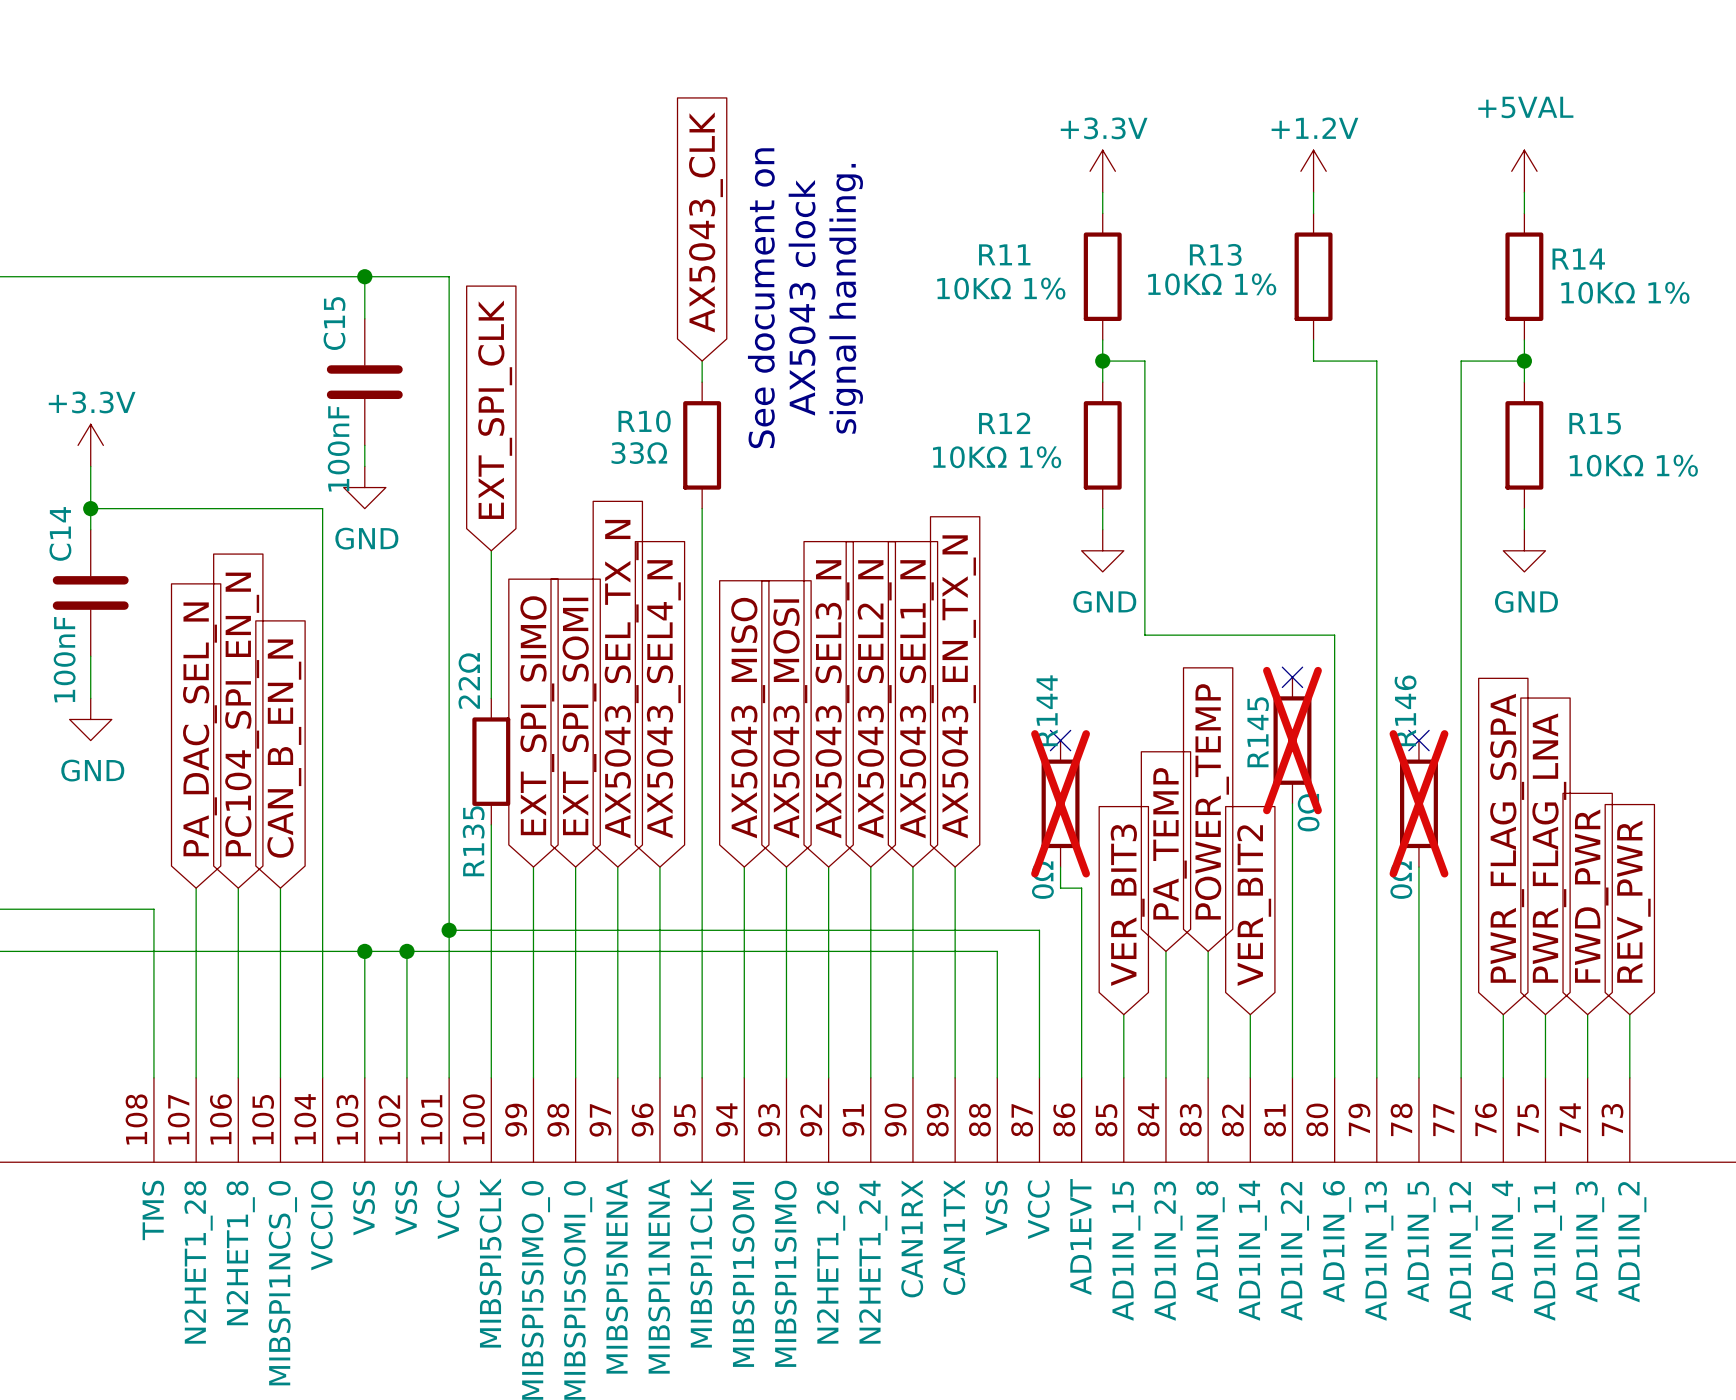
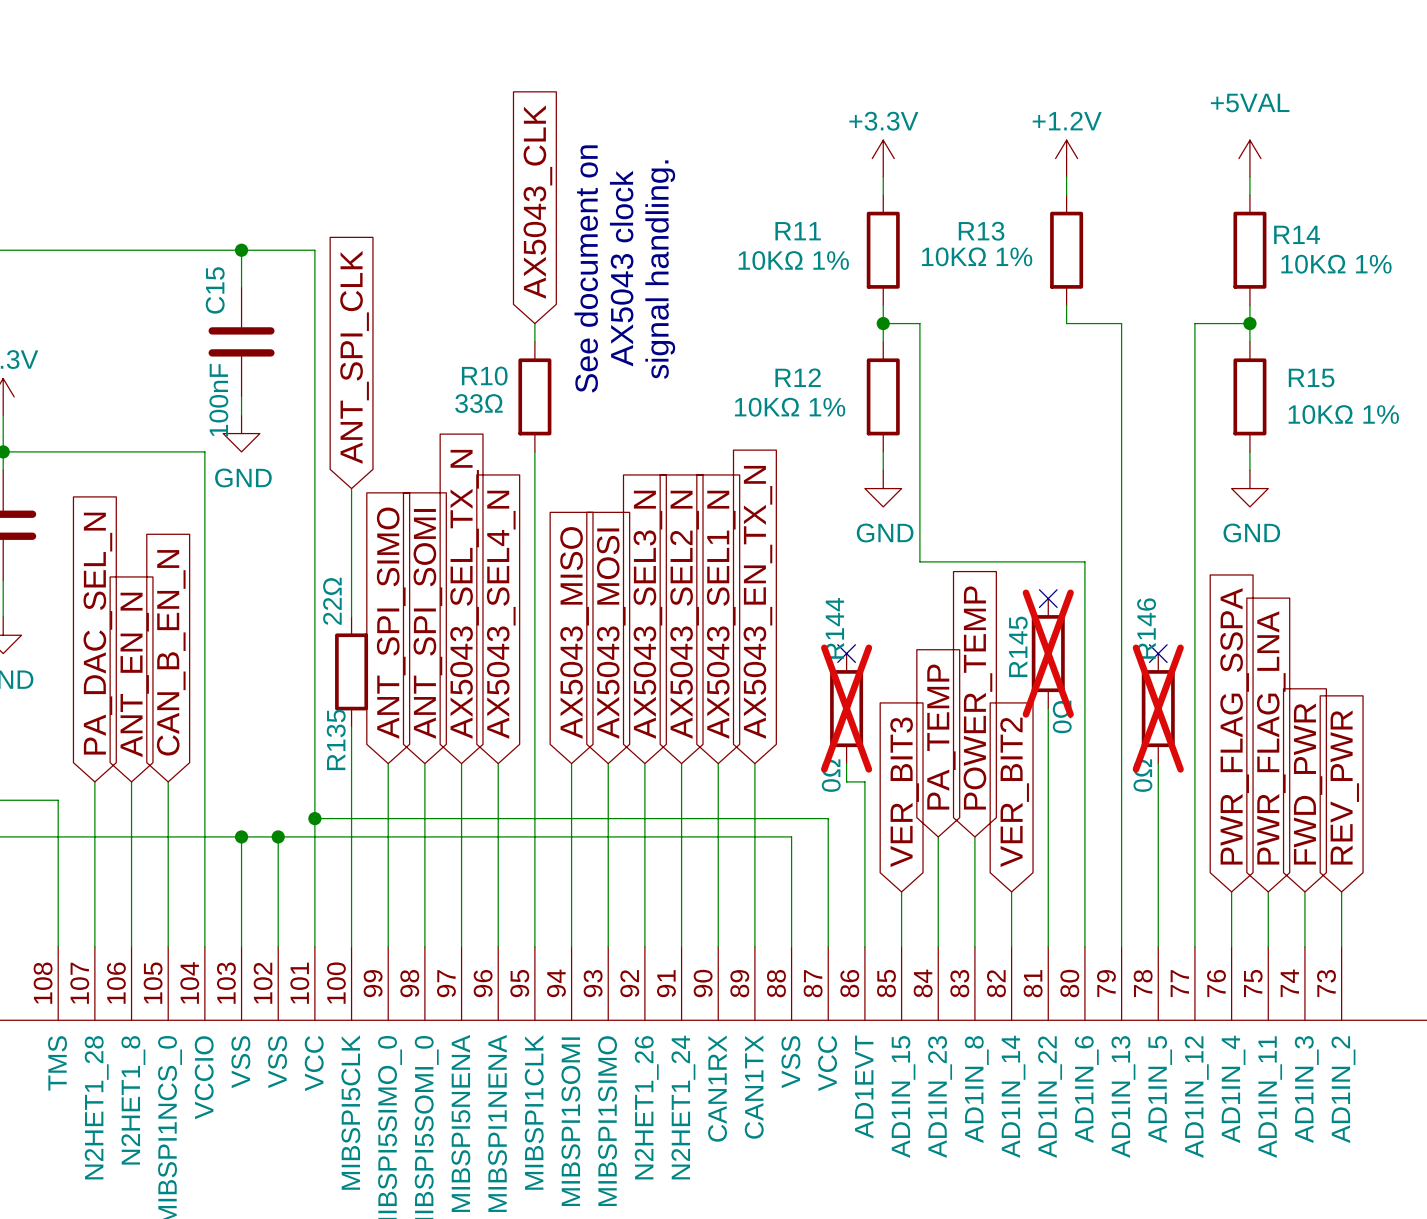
global label: EXT_SPI_CLK (495, 409) -> ANT_SPI_CLK (354, 357)
global label: PC104_SPI_EN_N (242, 714) -> ANT_EN_N (134, 674)
global label: EXT_SPI_SIMO (537, 715) -> ANT_SPI_SIMO (391, 623)
global label: EXT_SPI_SOMI (579, 716) -> ANT_SPI_SOMI (427, 623)

